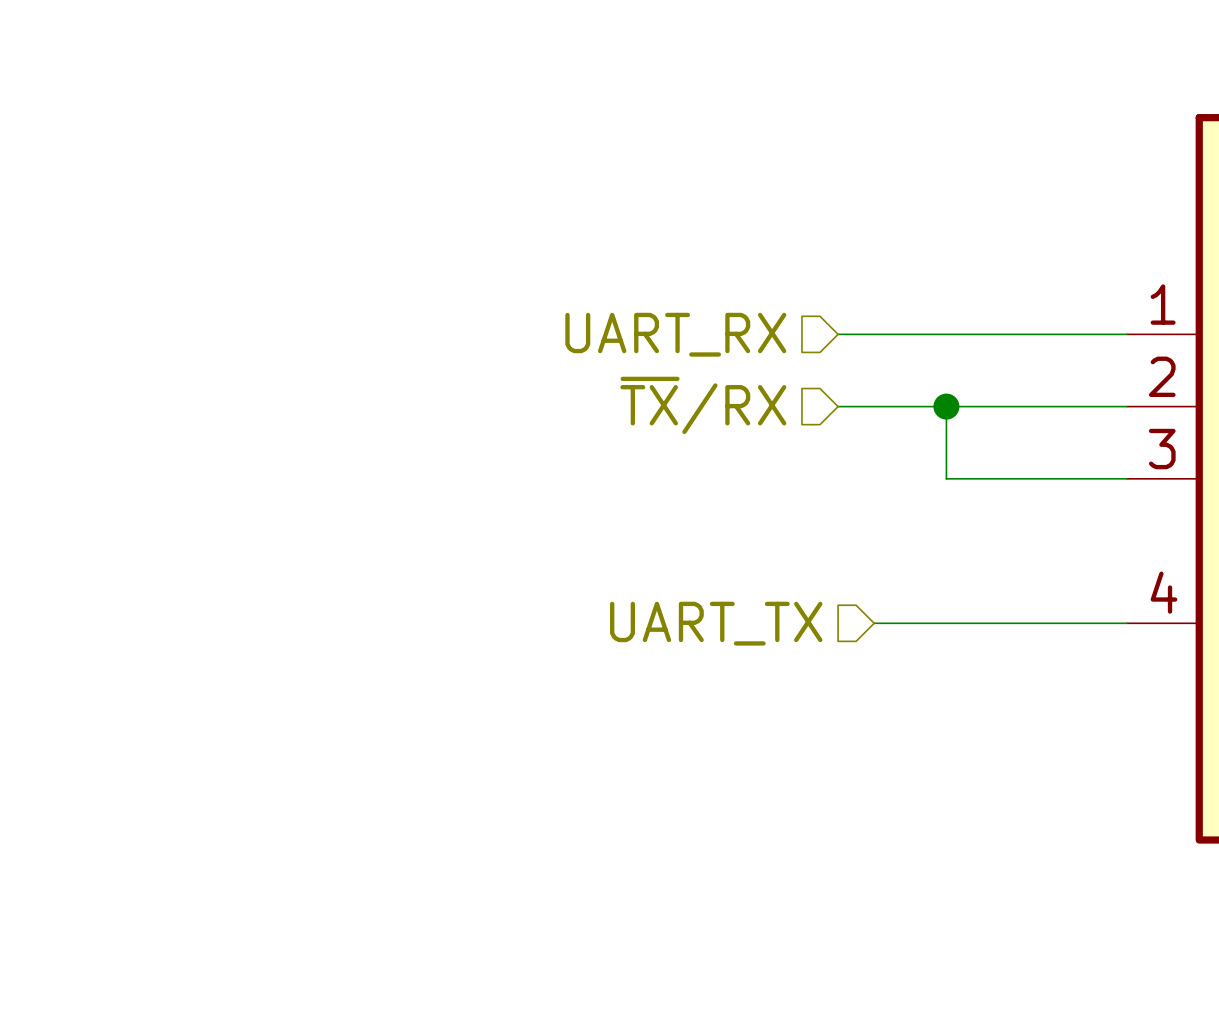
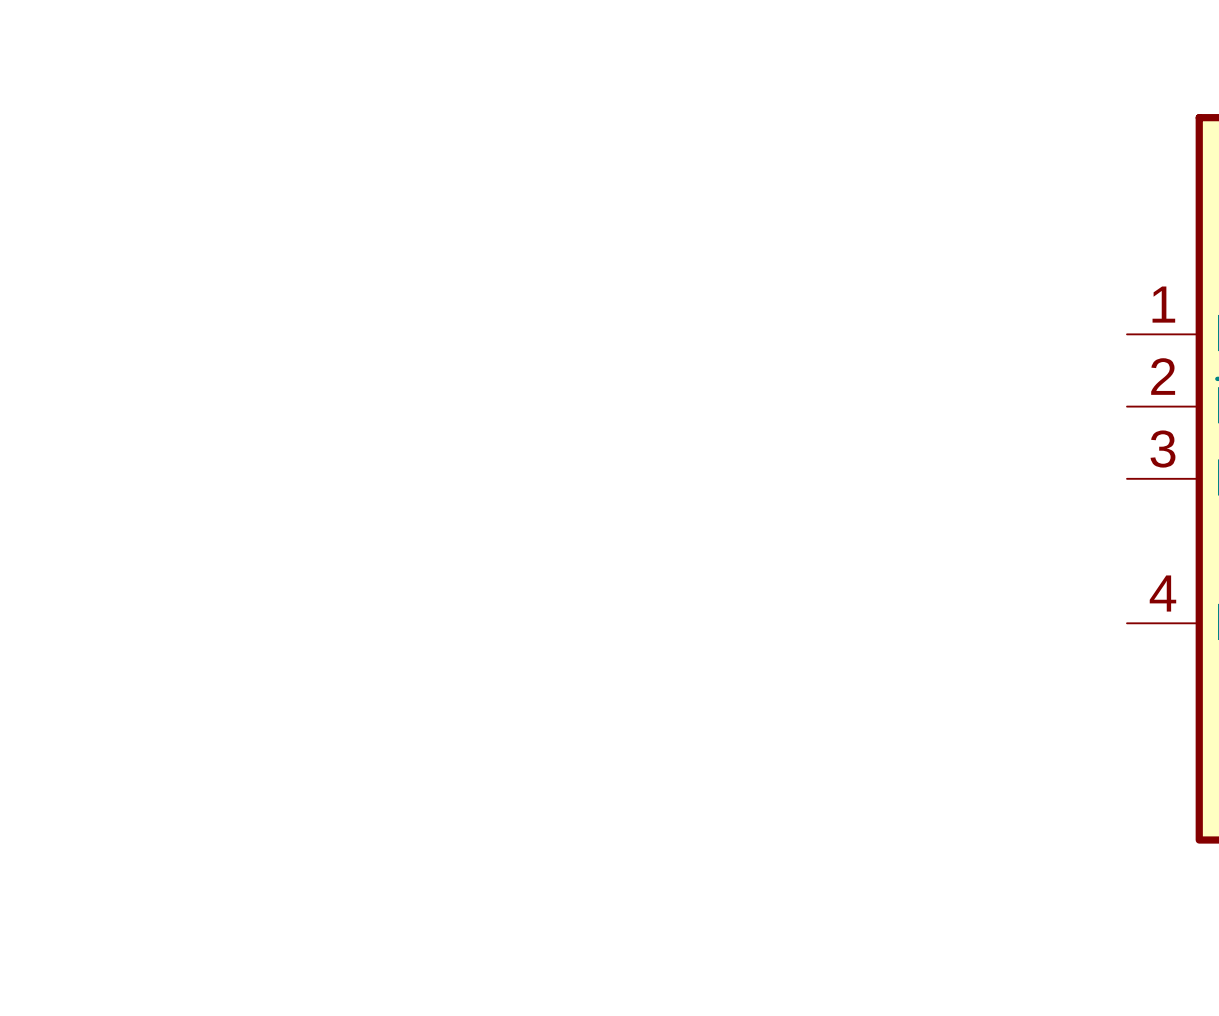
hierarchical label: UART_RX (675, 334) -> none
wire: (838, 334) (1127, 334) -> none
hierarchical label: ~{TX}/RX (703, 405) -> none
wire: (838, 406) (1127, 406) -> none
wire: (946, 406) (946, 478) (1127, 478) -> none
junction: (946, 406) -> none
hierarchical label: UART_TX (716, 623) -> none
wire: (874, 623) (1127, 623) -> none

